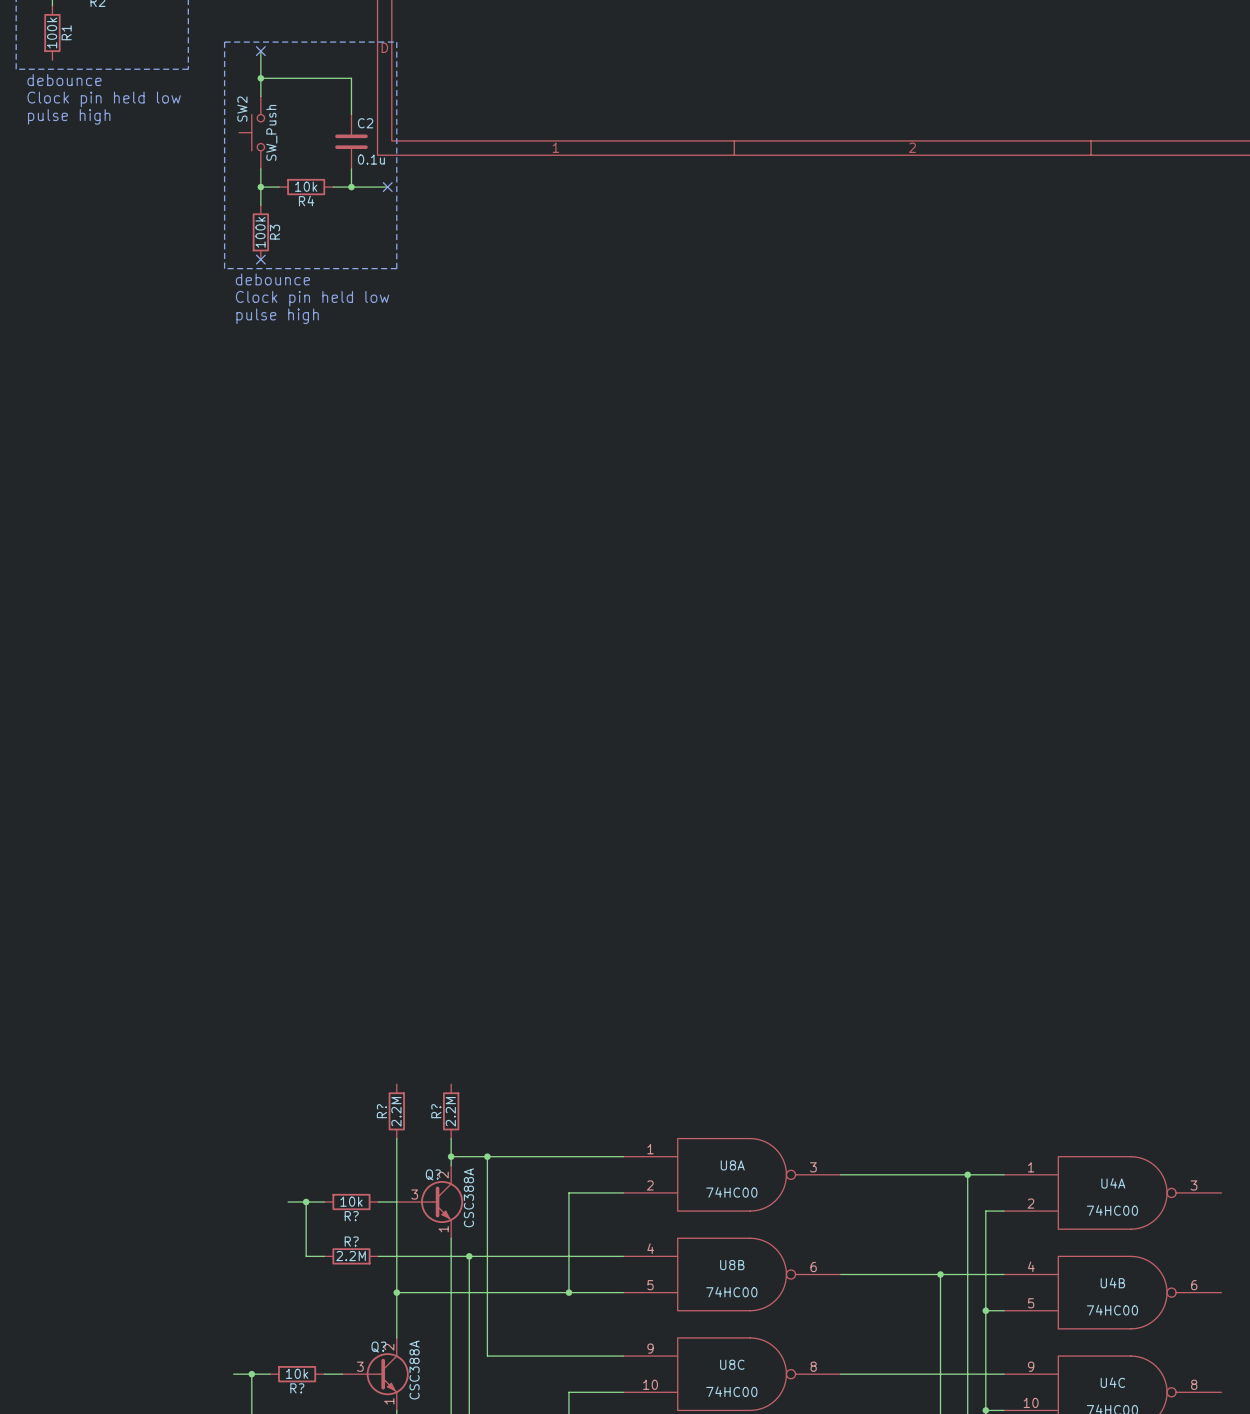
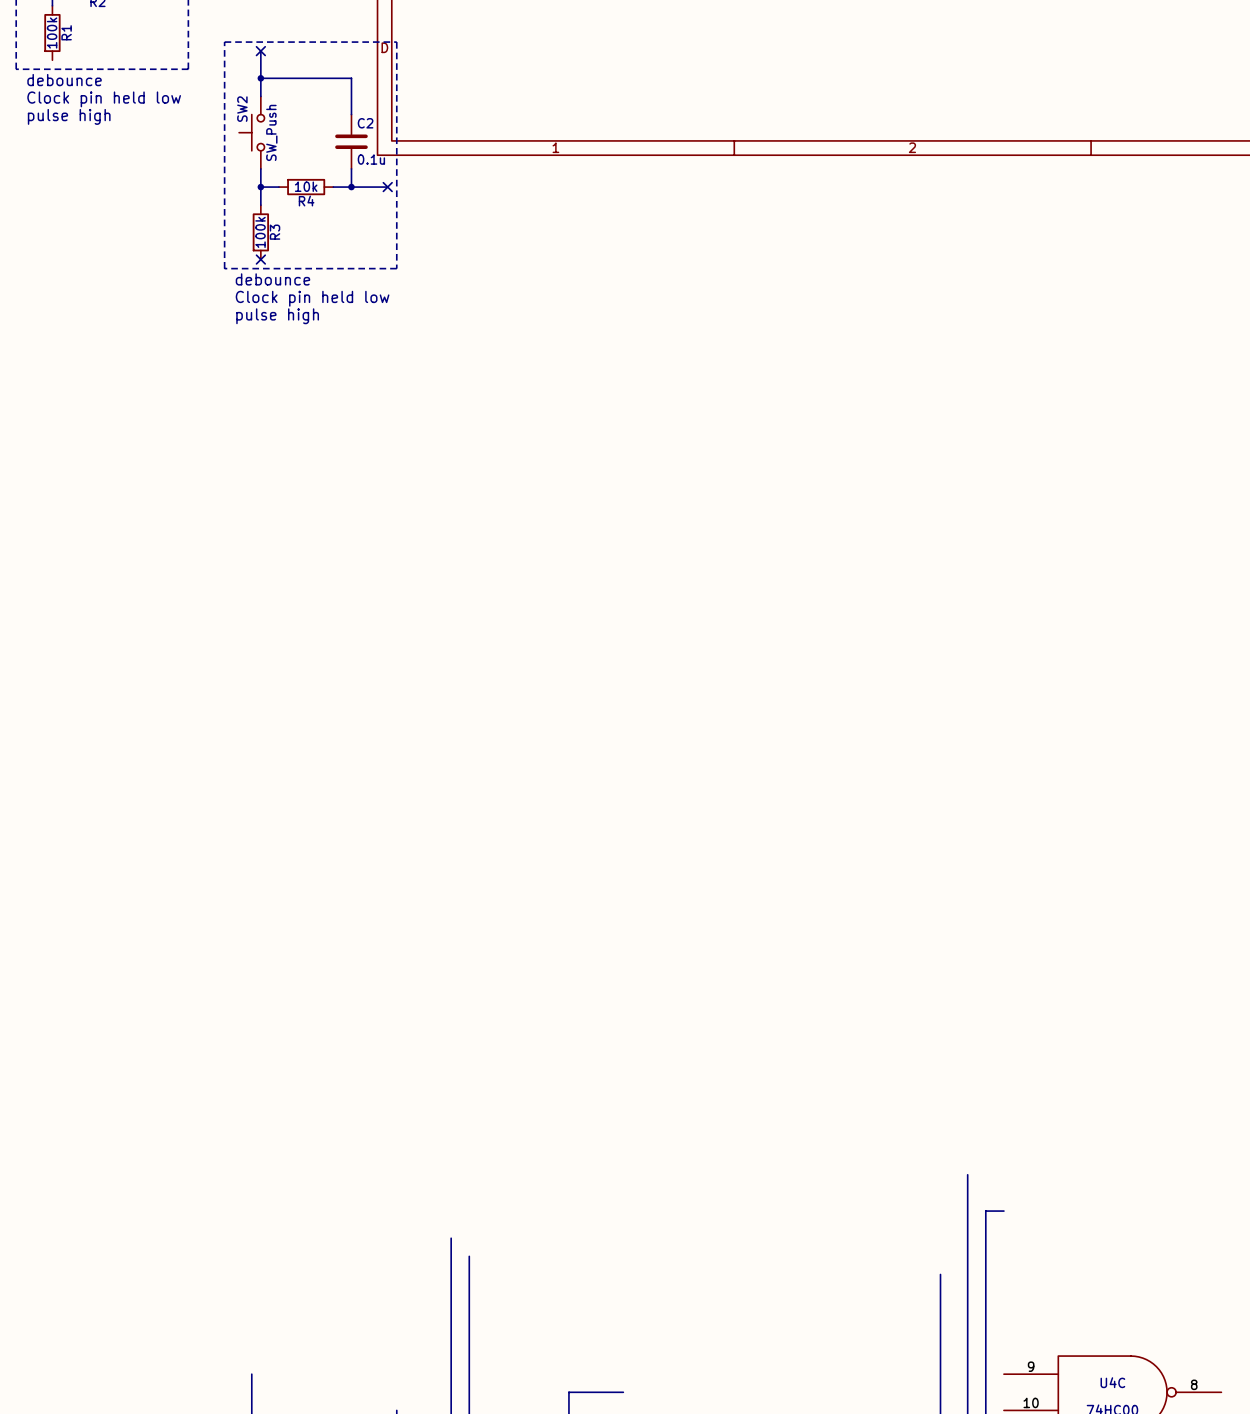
R?: 2.2M (396, 1111) -> none
R?: 2.2M (451, 1111) -> none
wire: (396, 1138) (396, 1337) -> none
wire: (451, 1138) (451, 1165) -> none
wire: (451, 1156) (623, 1156) -> none
junction: (451, 1156) -> none
wire: (487, 1156) (487, 1356) (623, 1356) -> none
junction: (487, 1156) -> none
U8A: 74HC00 (732, 1174) -> none
wire: (840, 1174) (1003, 1174) -> none
junction: (967, 1174) -> none
wire: (623, 1192) (568, 1192) (568, 1292) -> none
U4A: 74HC00 (1112, 1192) -> none
wire: (288, 1202) (324, 1202) -> none
wire: (306, 1202) (306, 1256) (324, 1256) -> none
junction: (306, 1202) -> none
R?: 10k (351, 1202) -> none
wire: (378, 1202) (396, 1202) -> none
Q?: CSC388A (429, 1202) -> none
R?: 2.2M (351, 1256) -> none
wire: (378, 1256) (623, 1256) -> none
junction: (469, 1256) -> none
U8B: 74HC00 (732, 1274) -> none
wire: (840, 1274) (1003, 1274) -> none
junction: (940, 1274) -> none
wire: (396, 1292) (623, 1292) -> none
junction: (396, 1292) -> none
junction: (568, 1292) -> none
U4B: 74HC00 (1112, 1292) -> none
wire: (985, 1310) (1003, 1310) -> none
junction: (985, 1310) -> none
wire: (233, 1374) (269, 1374) -> none
junction: (251, 1374) -> none
R?: 10k (297, 1374) -> none
wire: (324, 1374) (342, 1374) -> none
Q?: CSC388A (375, 1374) -> none
U8C: 74HC00 (732, 1374) -> none
wire: (840, 1374) (1003, 1374) -> none
wire: (985, 1410) (1003, 1410) -> none
junction: (985, 1410) -> none

